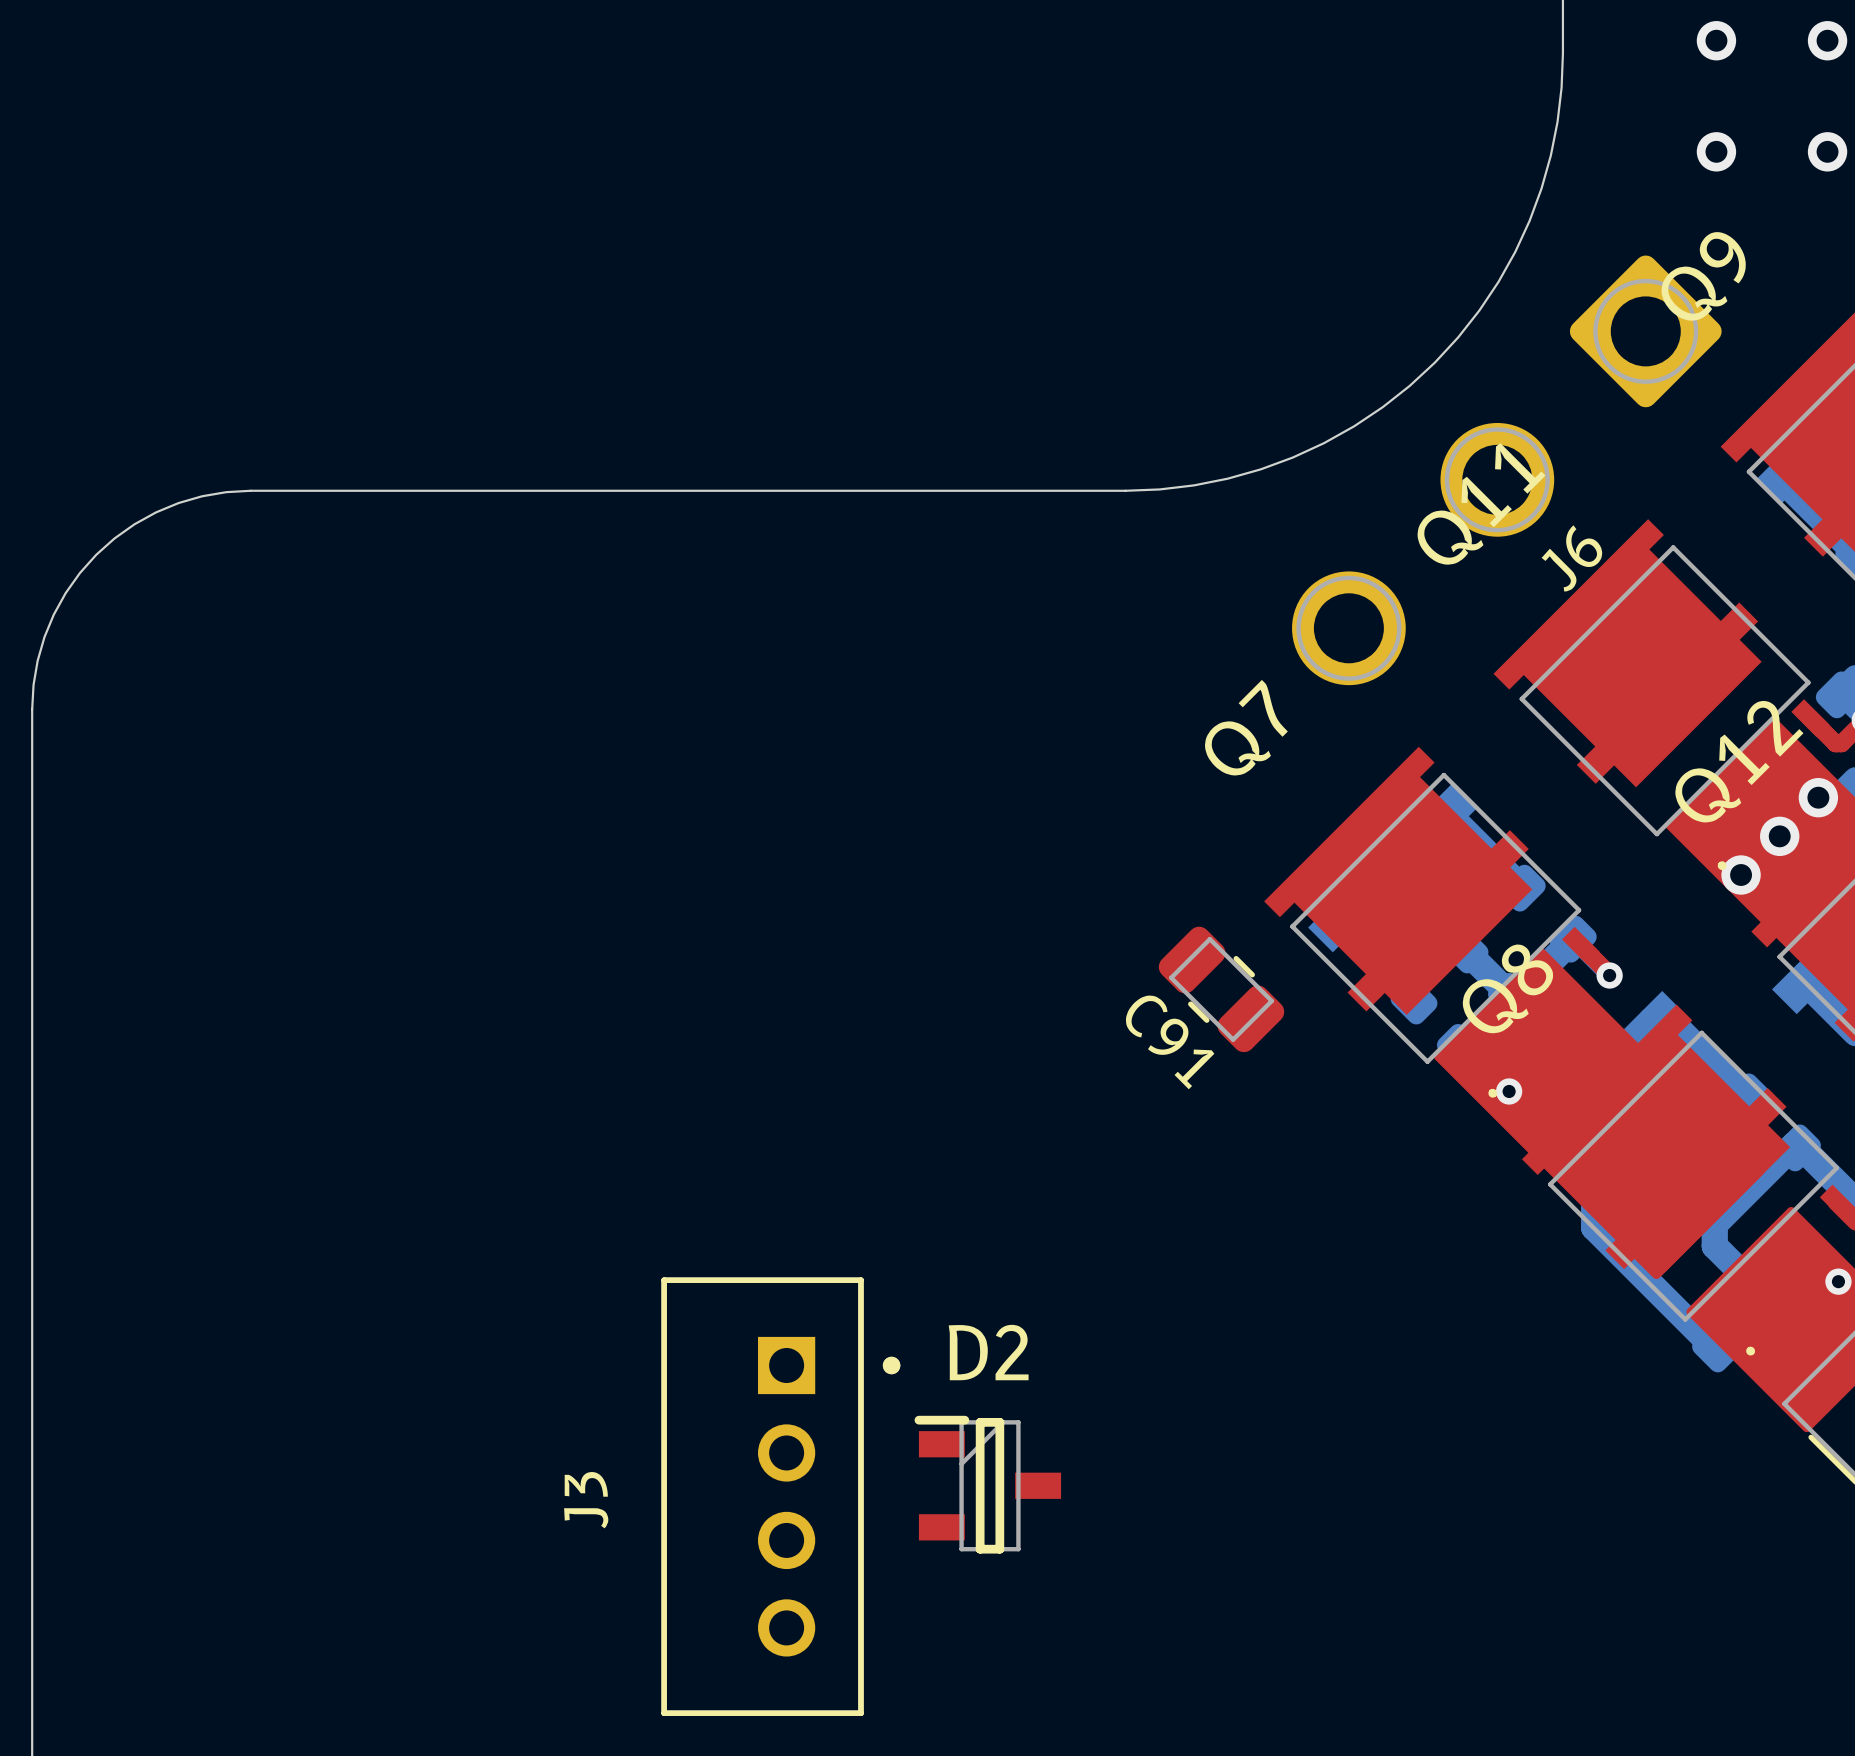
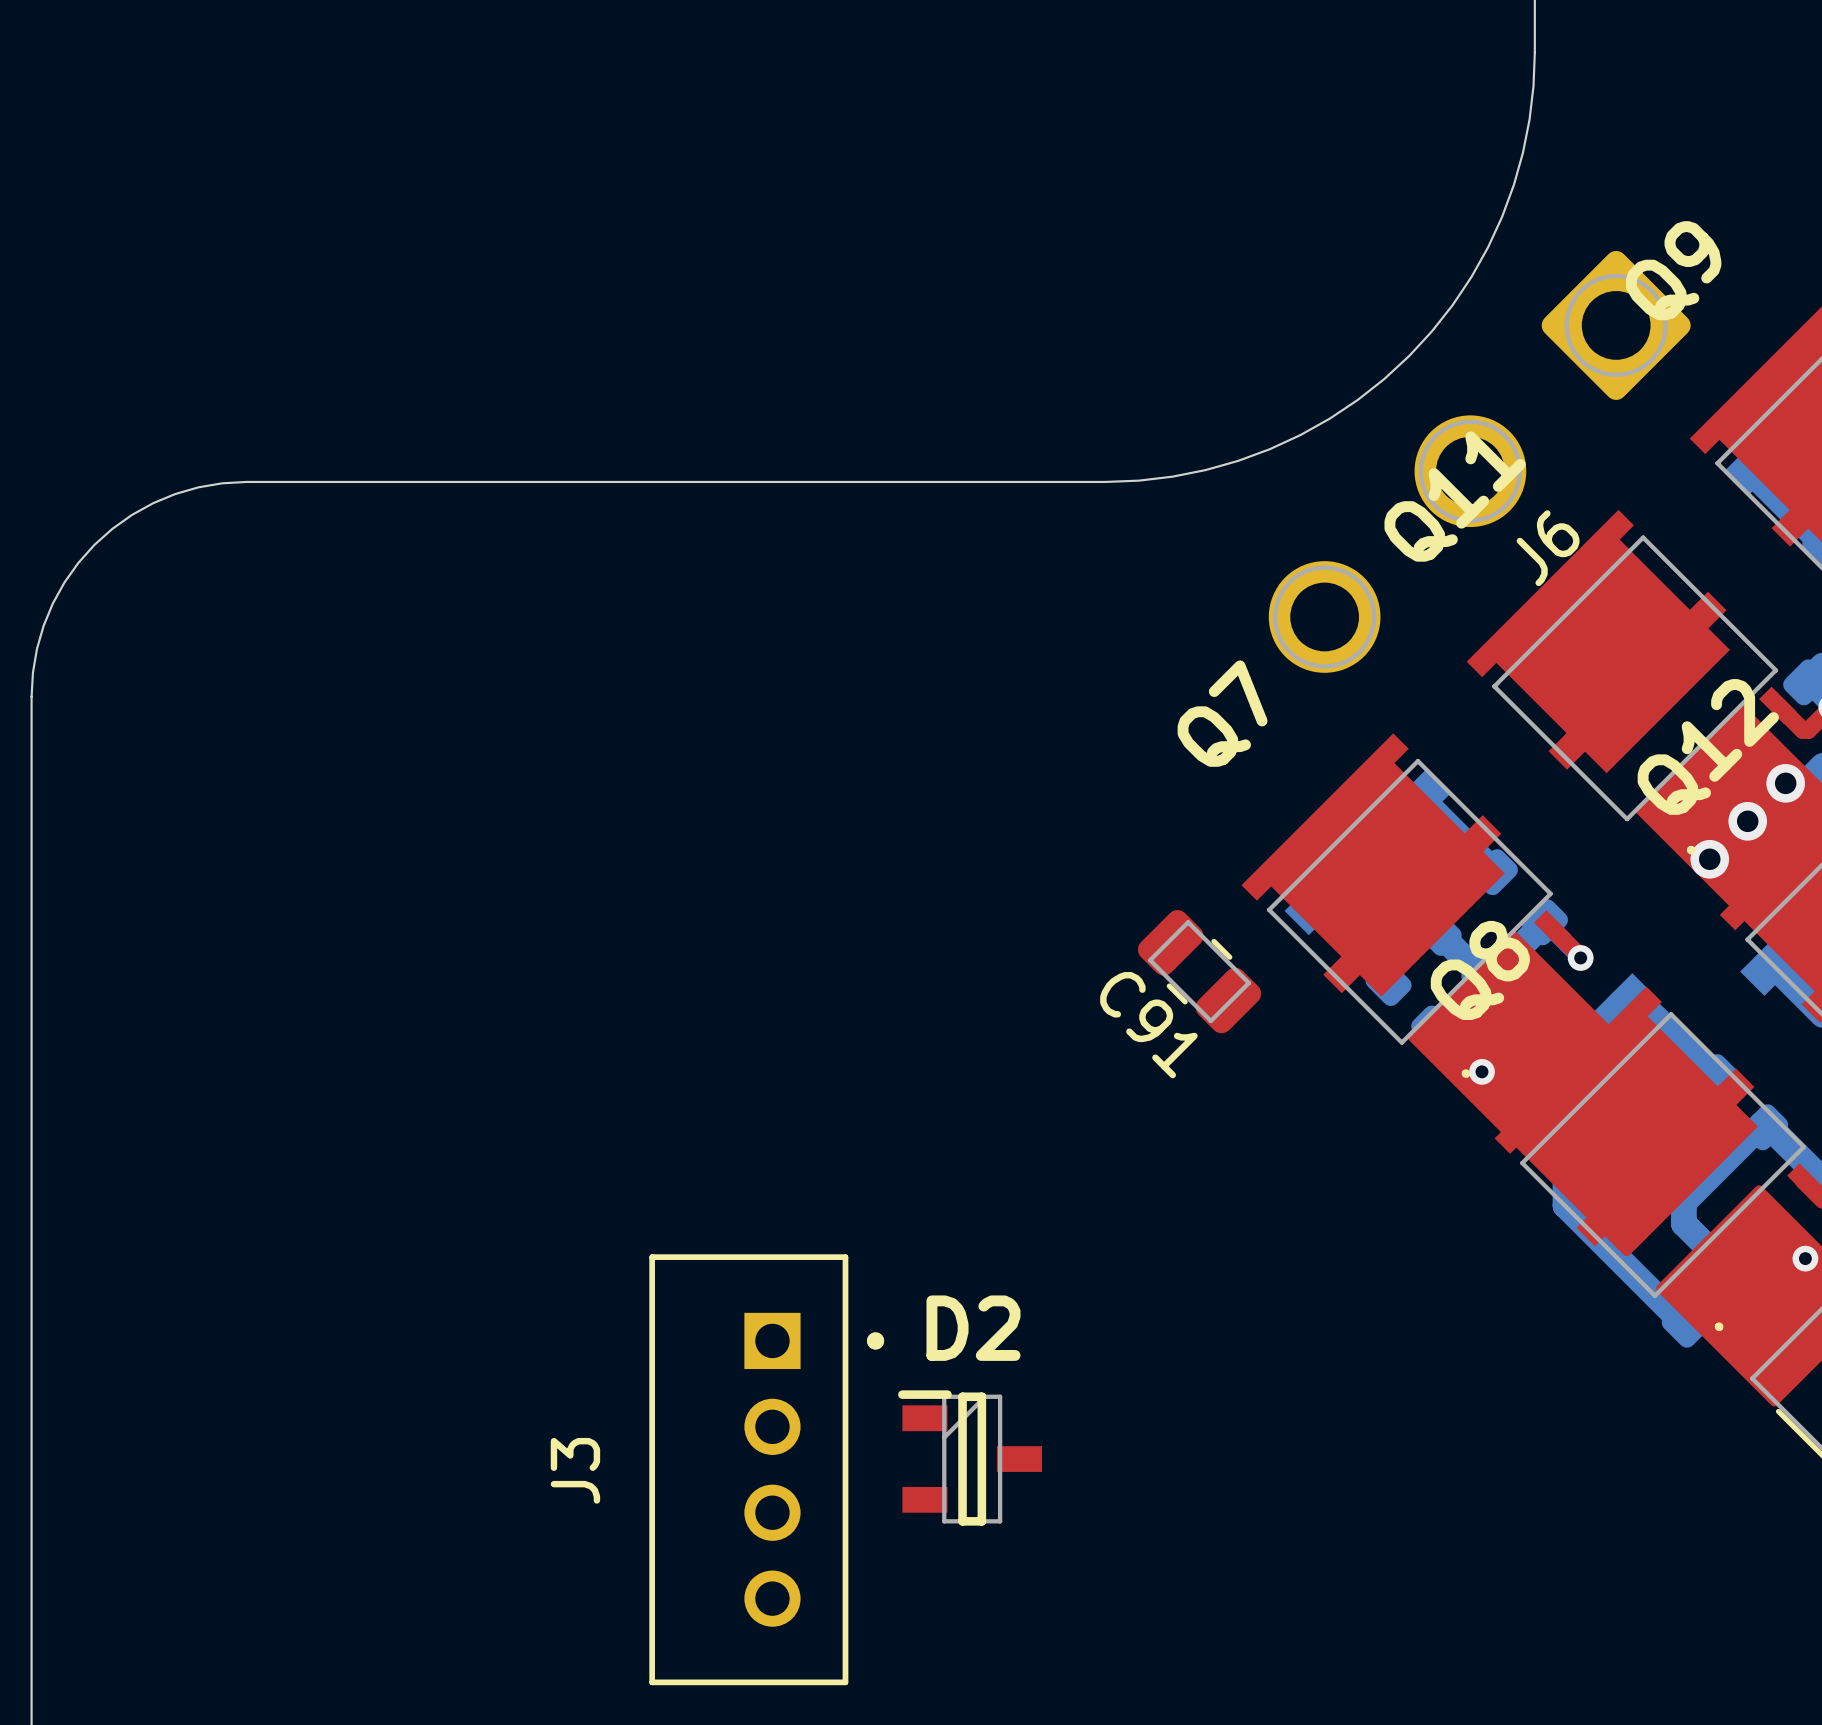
via: (1716, 40) -> none
via: (1827, 40) -> none
via: (1716, 151) -> none
via: (1827, 151) -> none

